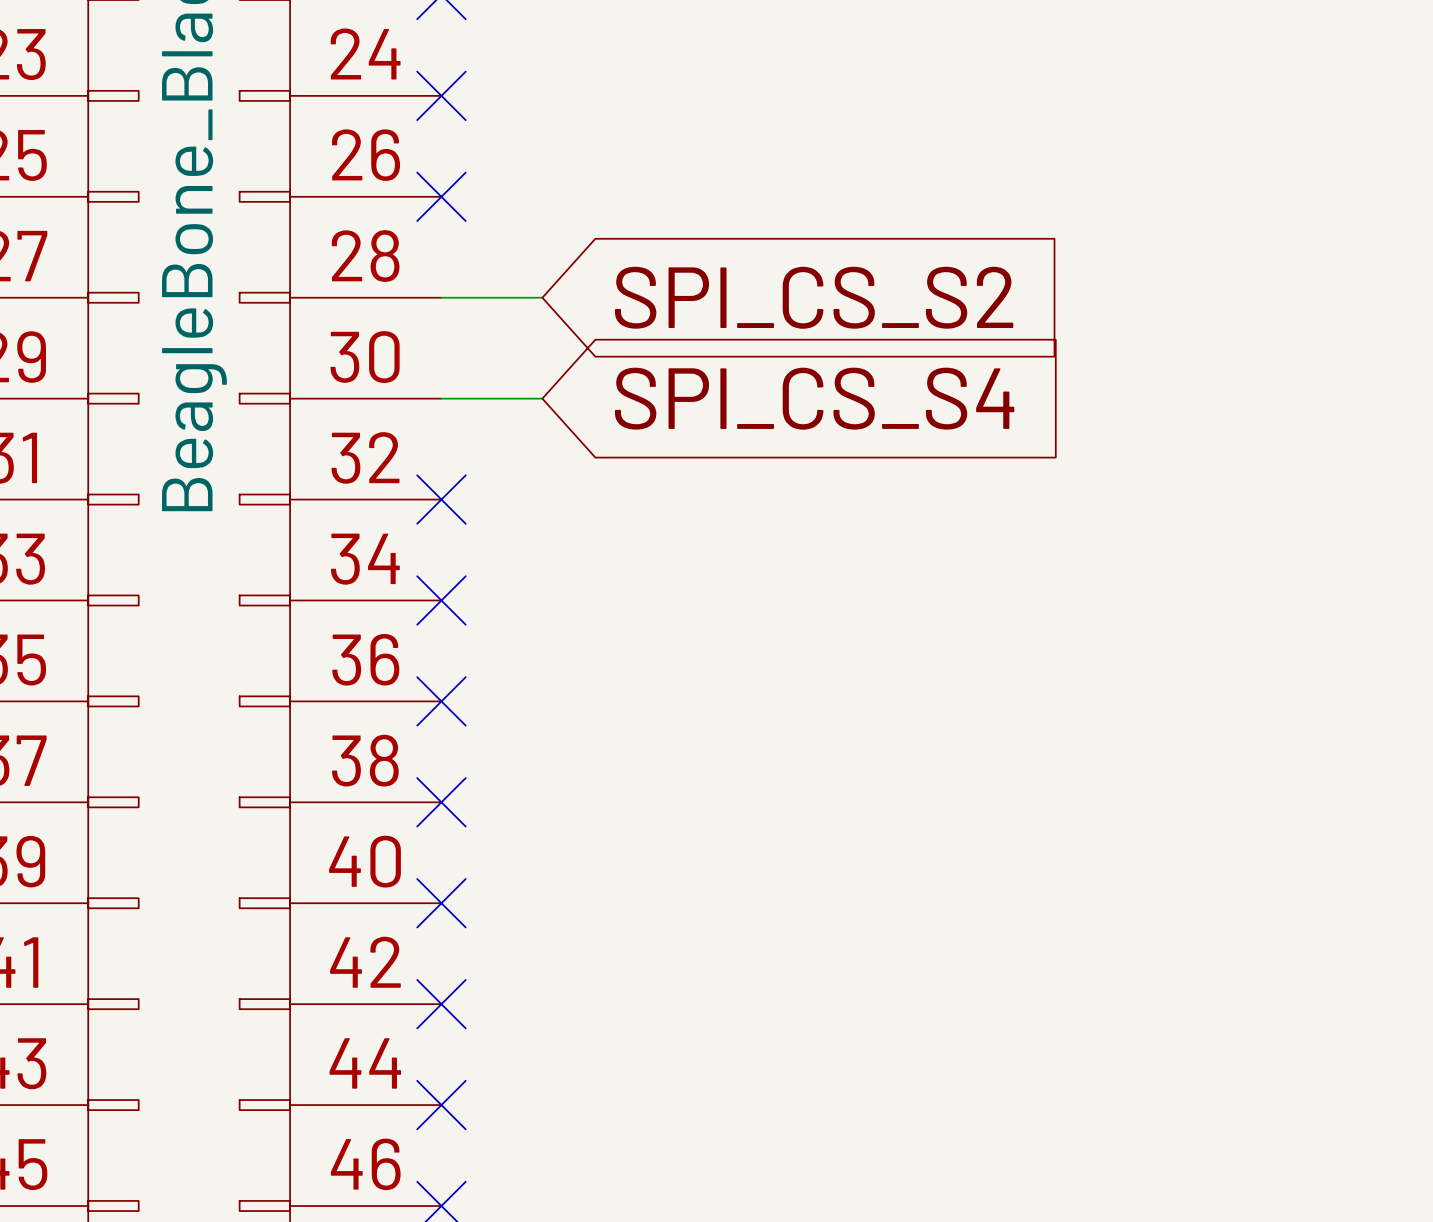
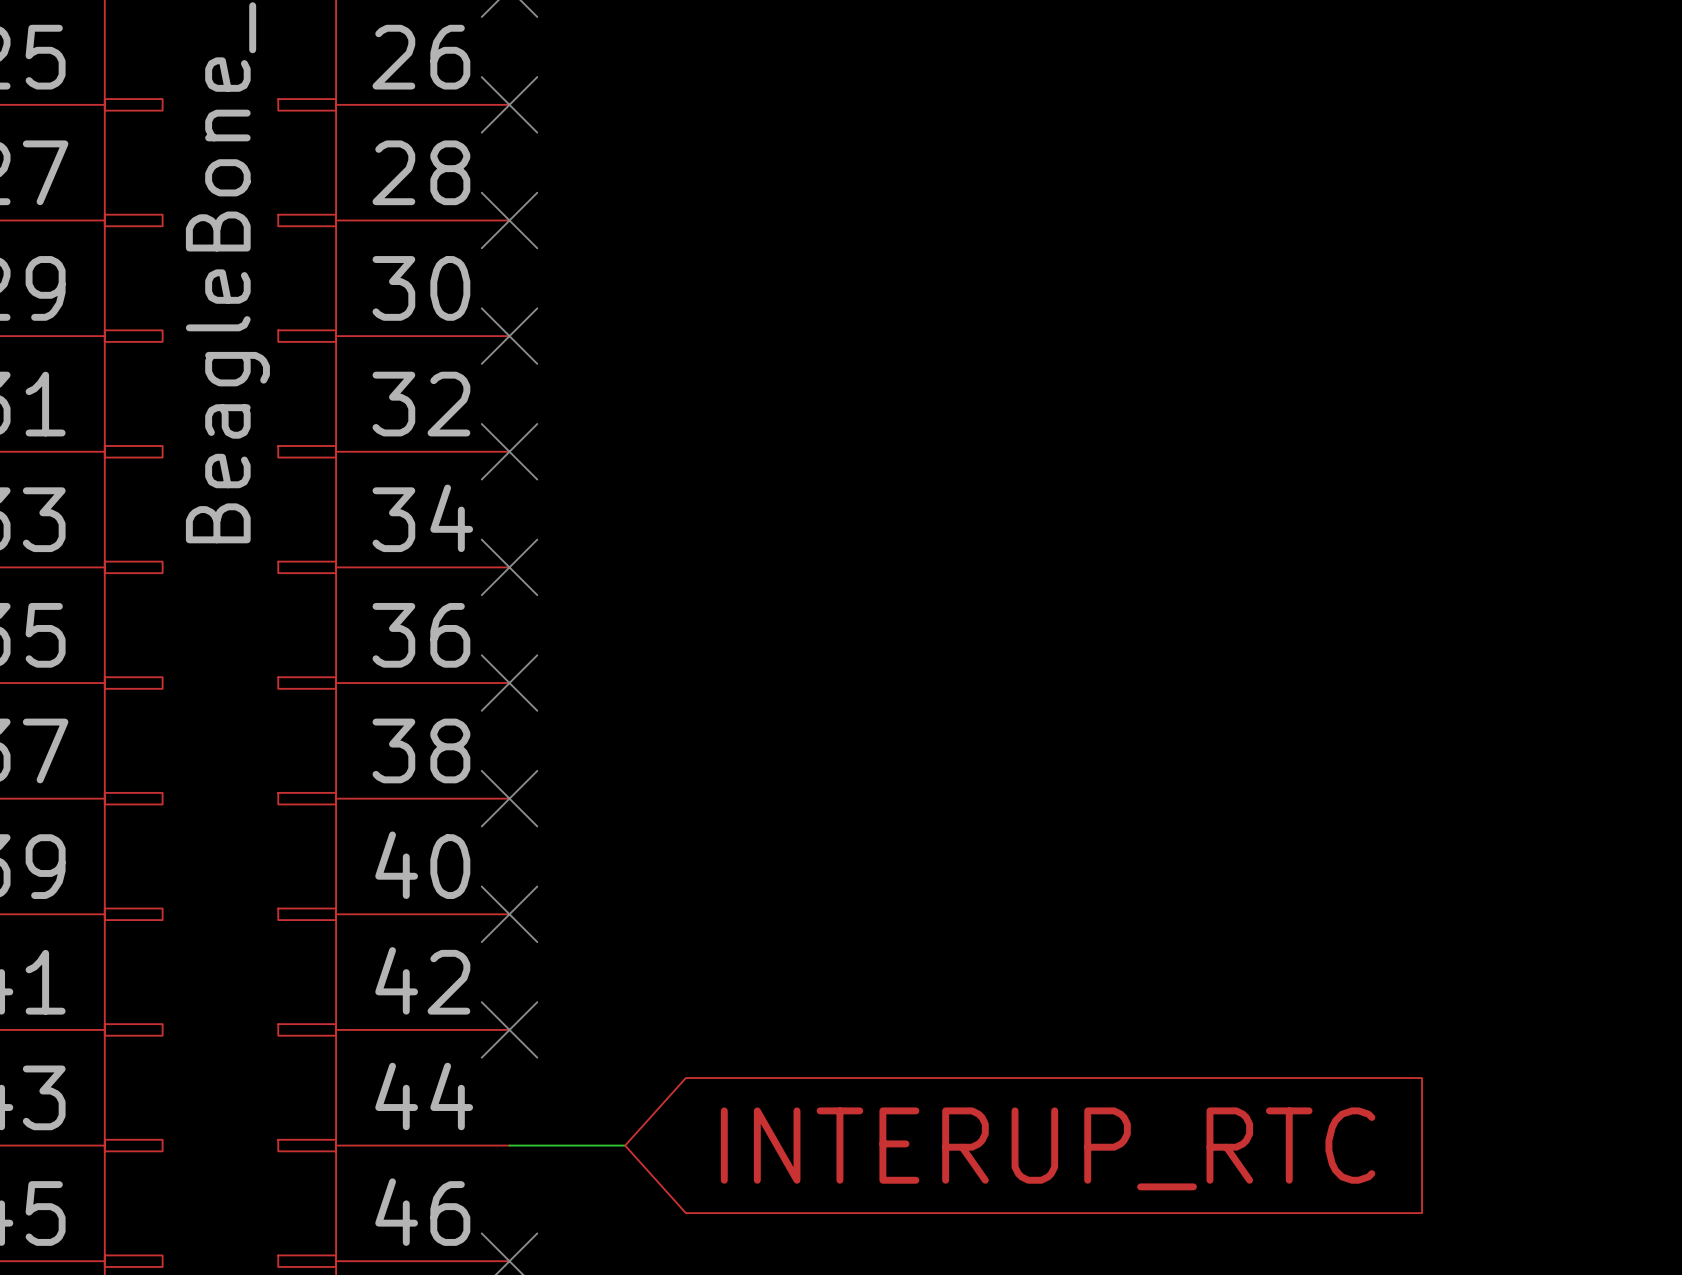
wire: (441, 297) (542, 297) -> none
no-connect mark: none -> (509, 220)
global label: SPI_CS_S2 (814, 297) -> none
wire: (441, 398) (542, 398) -> (509, 1145) (625, 1145)
no-connect mark: none -> (509, 336)
global label: SPI_CS_S4 (814, 398) -> none
no-connect mark: (441, 1105) -> none
global label: none -> INTERUP_RTC (1048, 1148)

